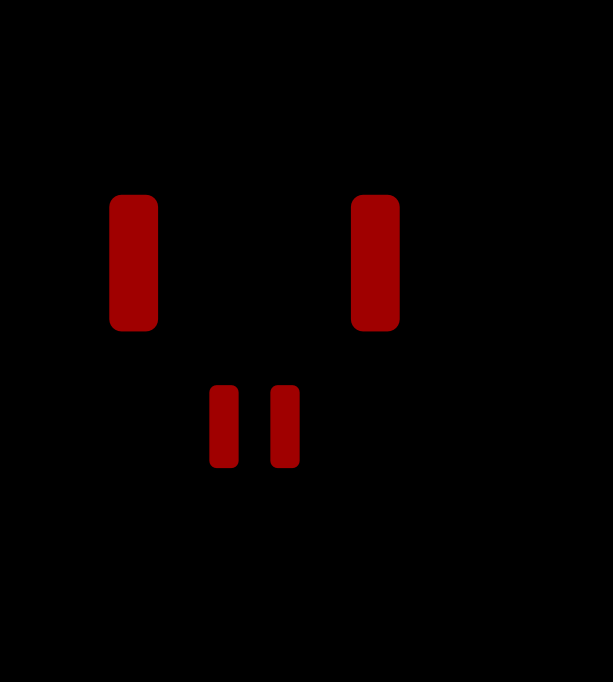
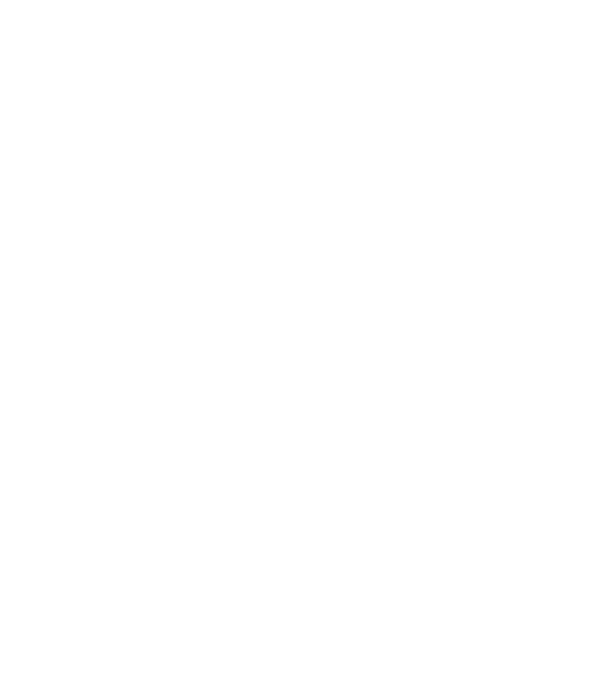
part: (254, 331) -> none

